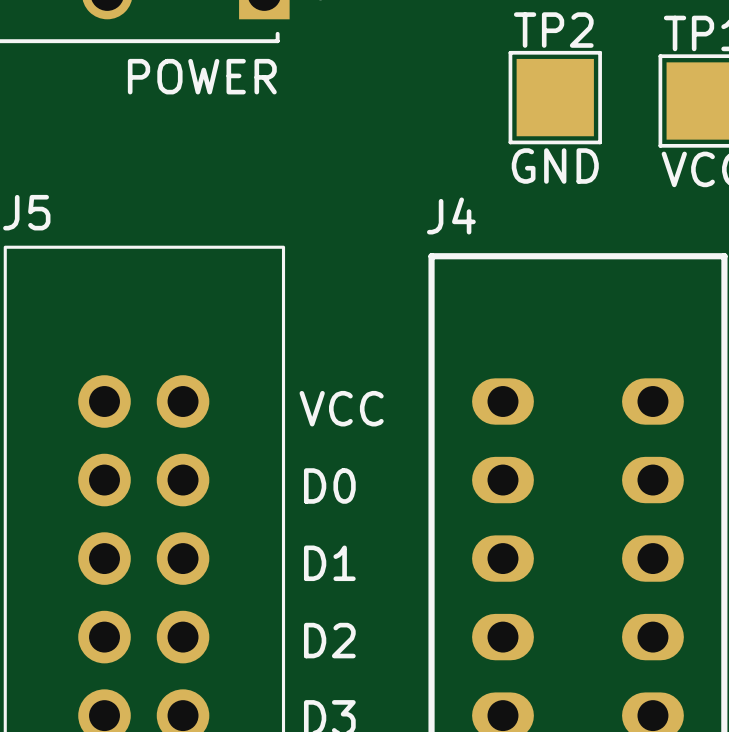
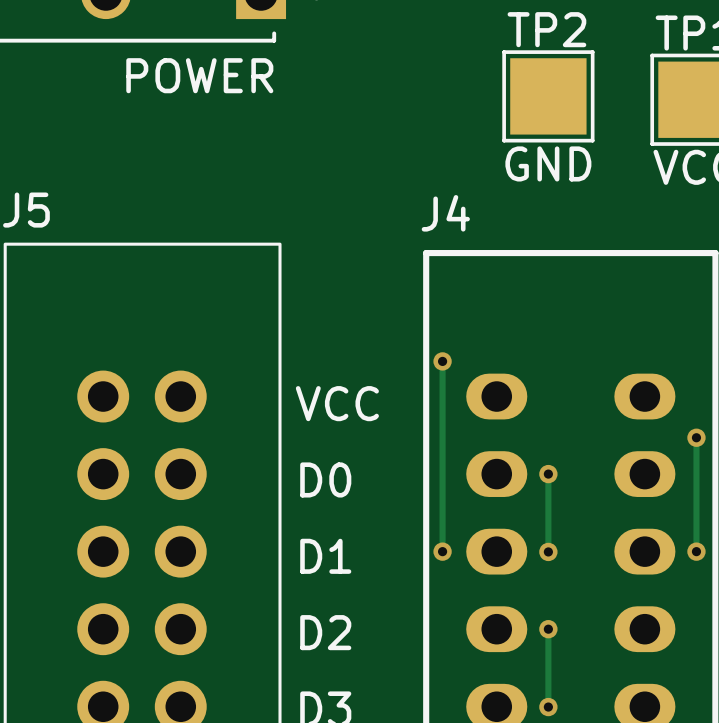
track: none -> (442, 361) (442, 551)
via: none -> (442, 361)
track: none -> (696, 437) (696, 551)
via: none -> (696, 437)
track: none -> (548, 474) (548, 551)
via: none -> (548, 474)
via: none -> (442, 551)
via: none -> (548, 551)
via: none -> (696, 551)
track: none -> (548, 629) (548, 707)
via: none -> (548, 629)
via: none -> (548, 707)

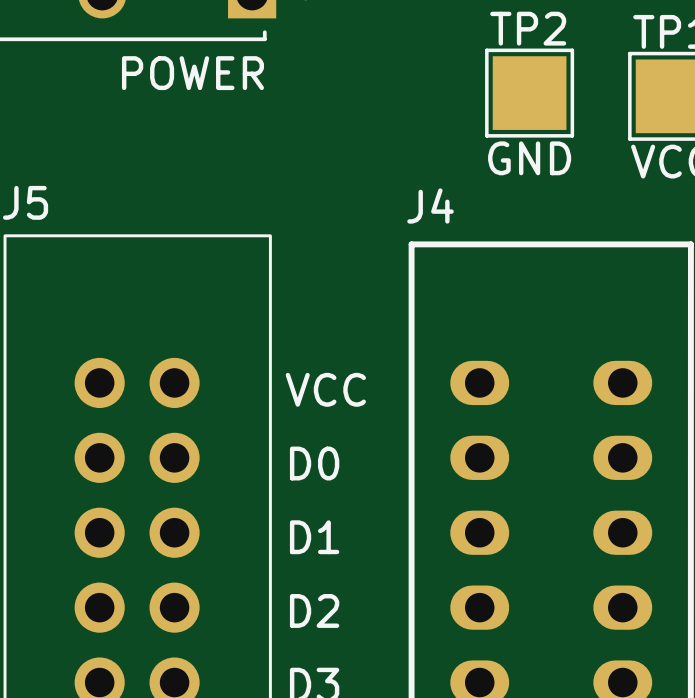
track: (442, 361) (442, 551) -> none
via: (442, 361) -> none
track: (696, 437) (696, 551) -> none
via: (696, 437) -> none
track: (548, 474) (548, 551) -> none
via: (548, 474) -> none
via: (442, 551) -> none
via: (548, 551) -> none
via: (696, 551) -> none
track: (548, 629) (548, 707) -> none
via: (548, 629) -> none
via: (548, 707) -> none

